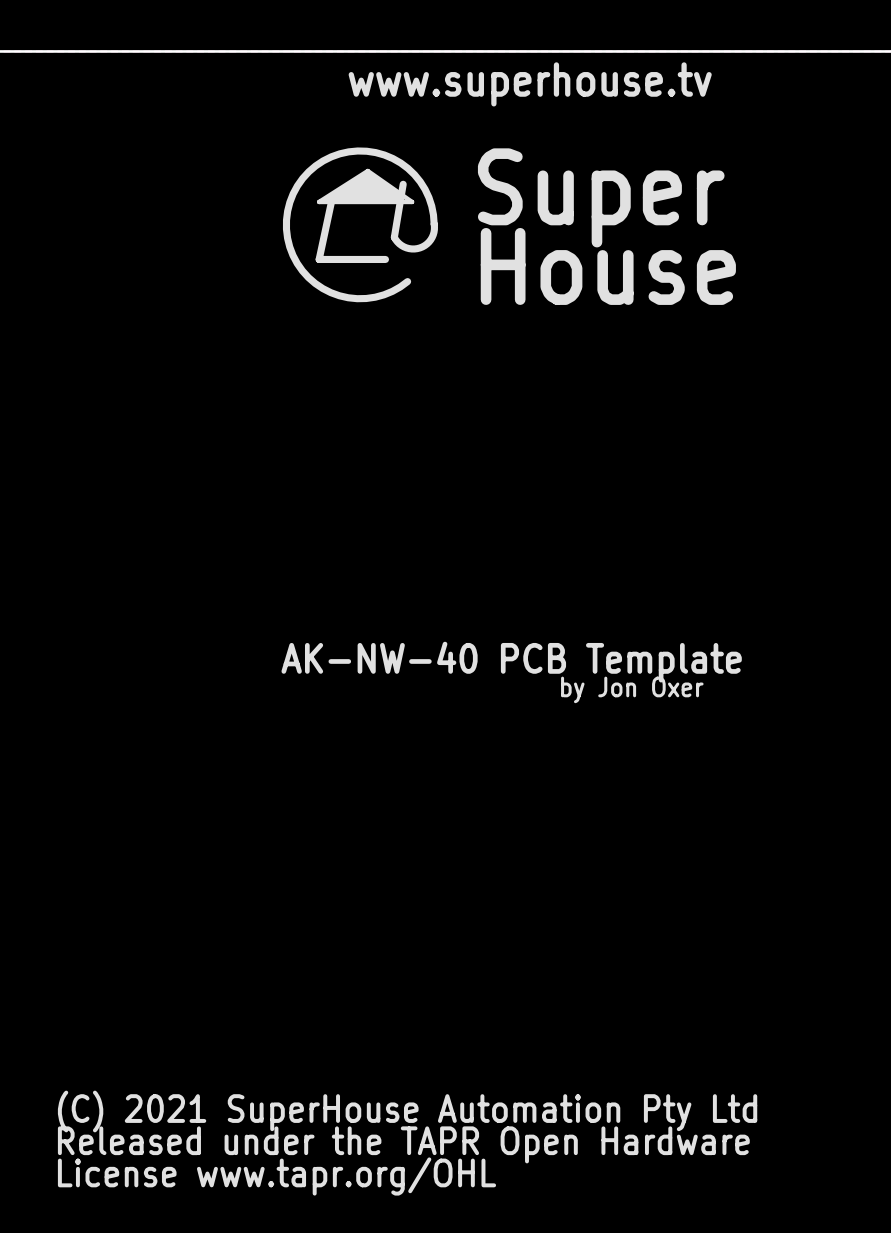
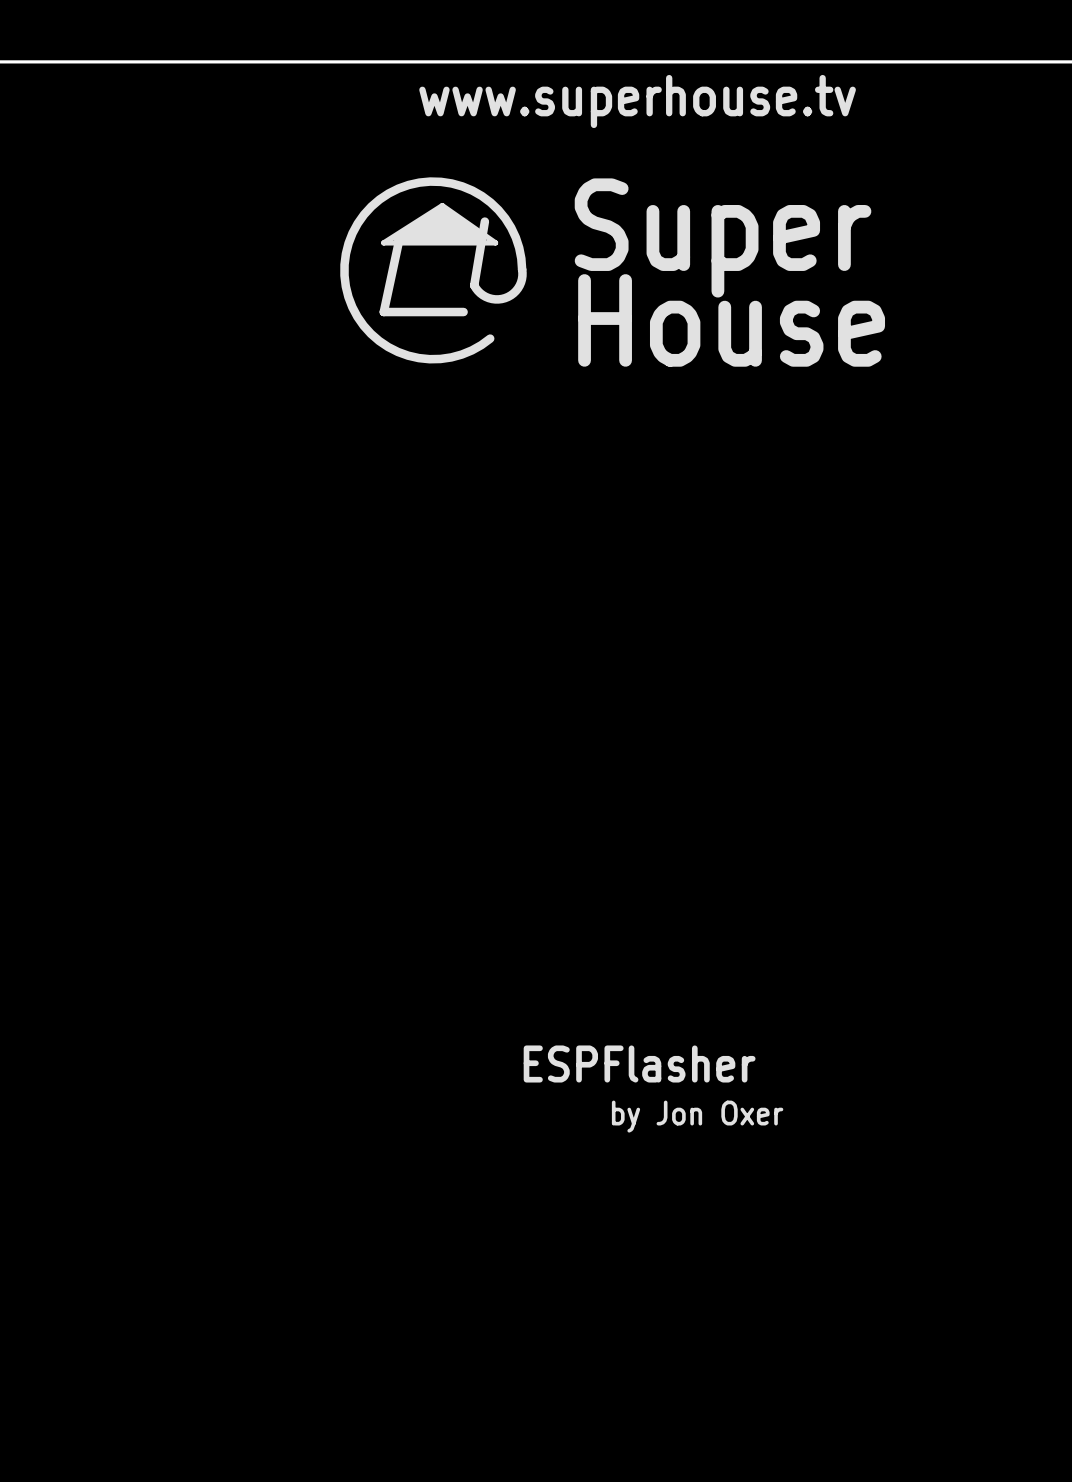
text: AK-NW-40 PCB Template (511, 662) -> none
text position: by Jon Oxer (632, 689) -> by Jon Oxer (697, 1116)
text: none -> ESPFlasher (639, 1063)
text: (C) 2021 SuperHouse Automation Pty Ltd (407, 1111) -> none
text: Released under the TAPR Open Hardware (403, 1144) -> none
text: License www.tapr.org/OHL (276, 1176) -> none

